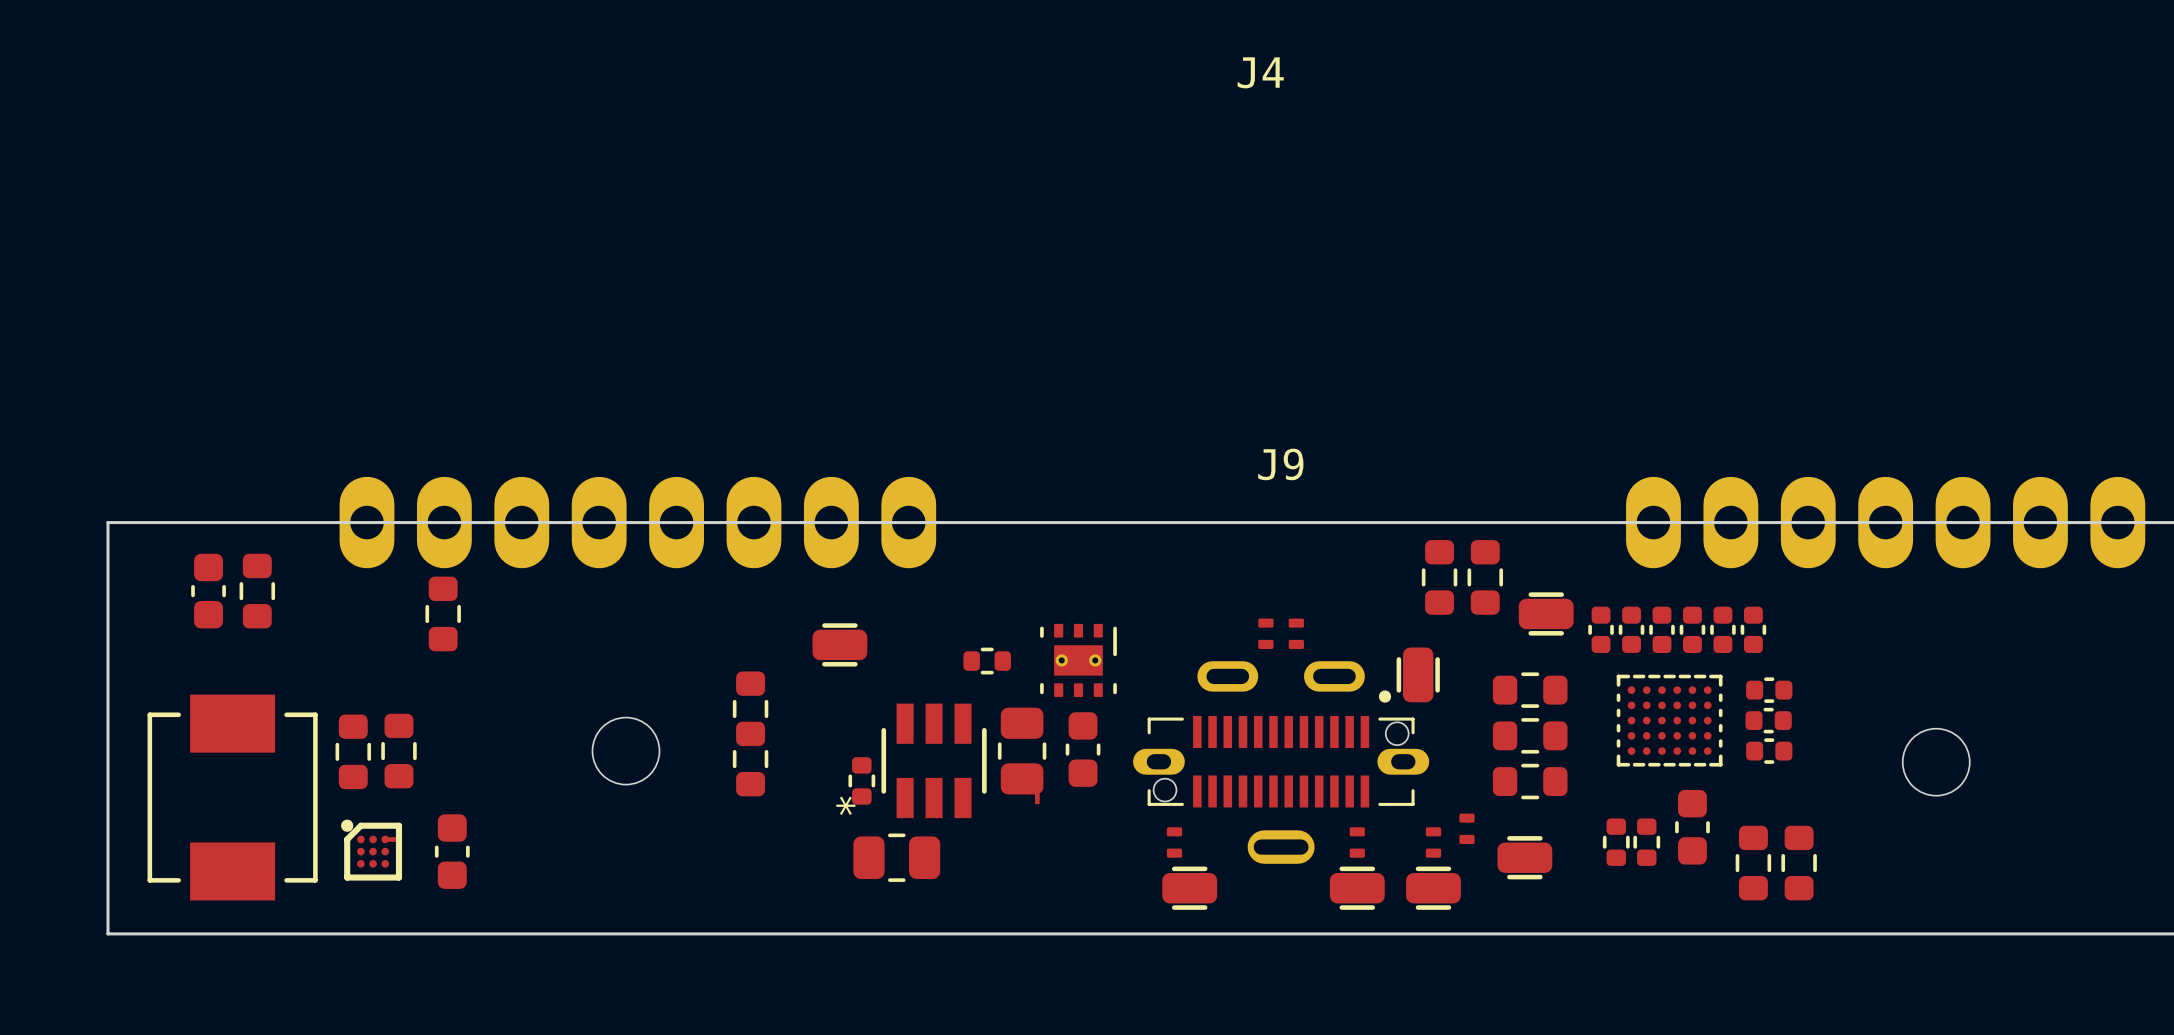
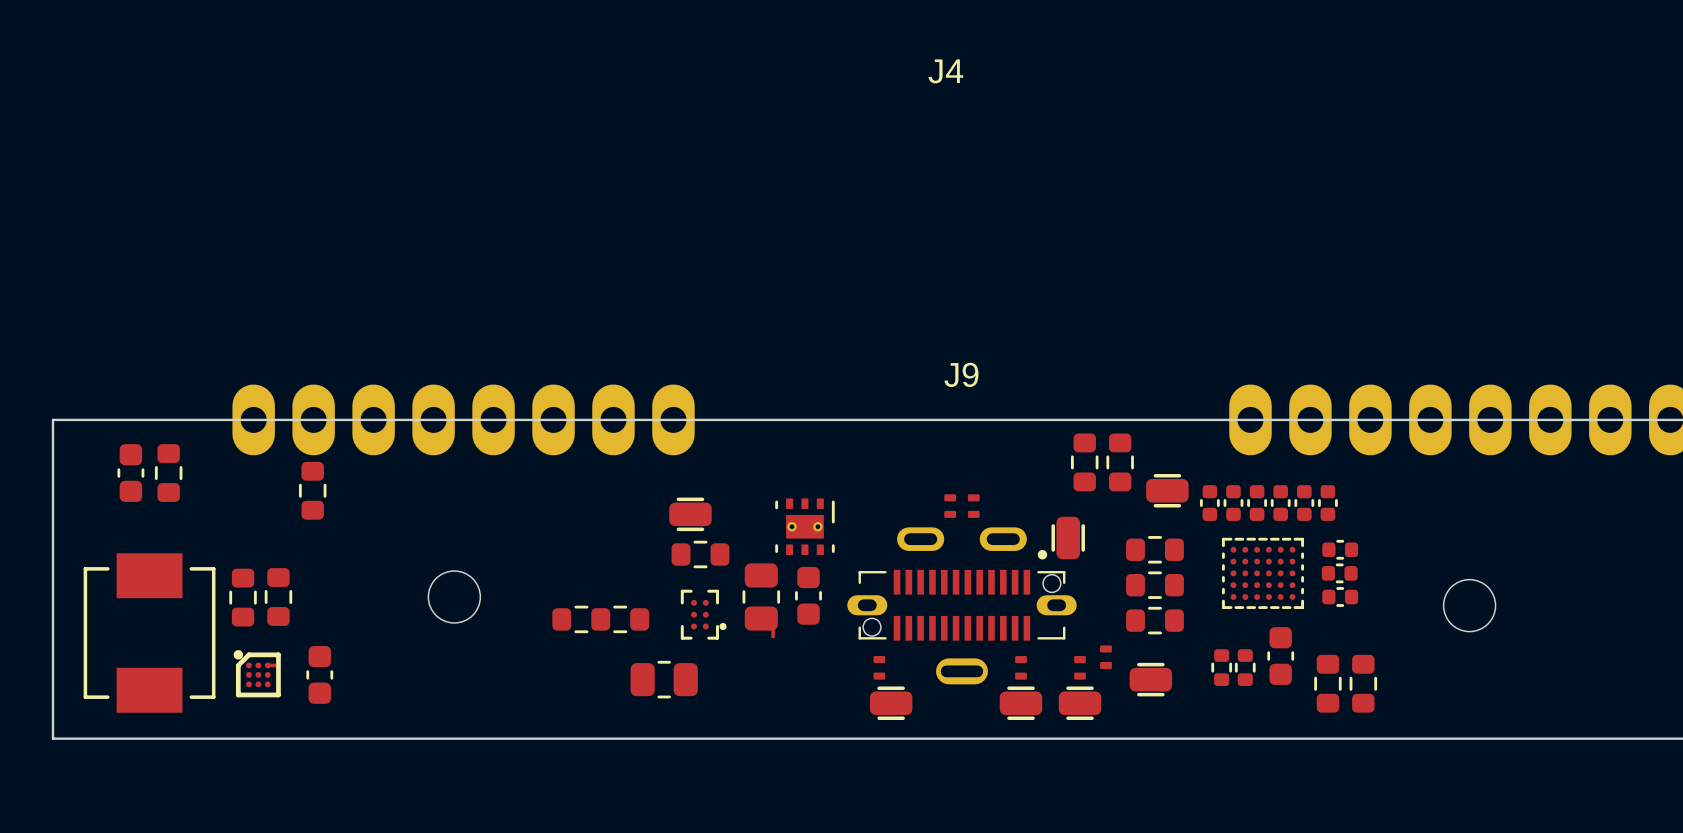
part position: (839, 644) -> (690, 514)
part: (987, 661) -> none
part: none -> (700, 554)
part footprint: [881, 703, 987, 819] -> [680, 589, 727, 640]
part rotation: 0° (750, 733) -> 90° clockwise (600, 619)
part position: (750, 733) -> (600, 619)
part: (861, 780) -> none

